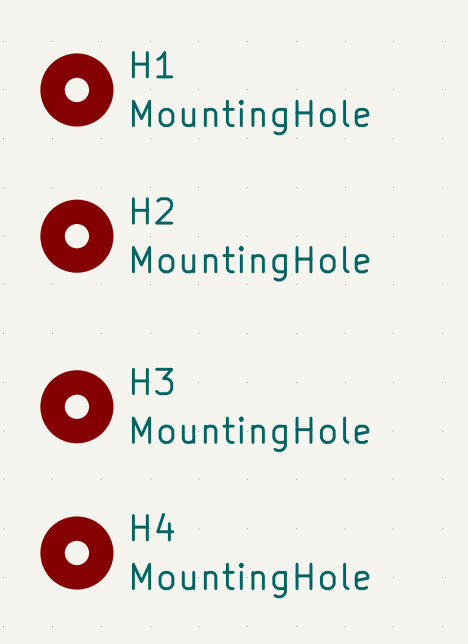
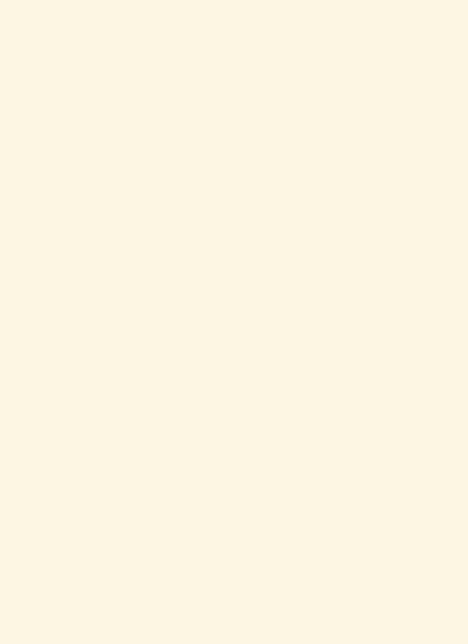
H1: MountingHole (76, 89) -> none
H2: MountingHole (76, 236) -> none
H3: MountingHole (76, 406) -> none
H4: MountingHole (76, 552) -> none

